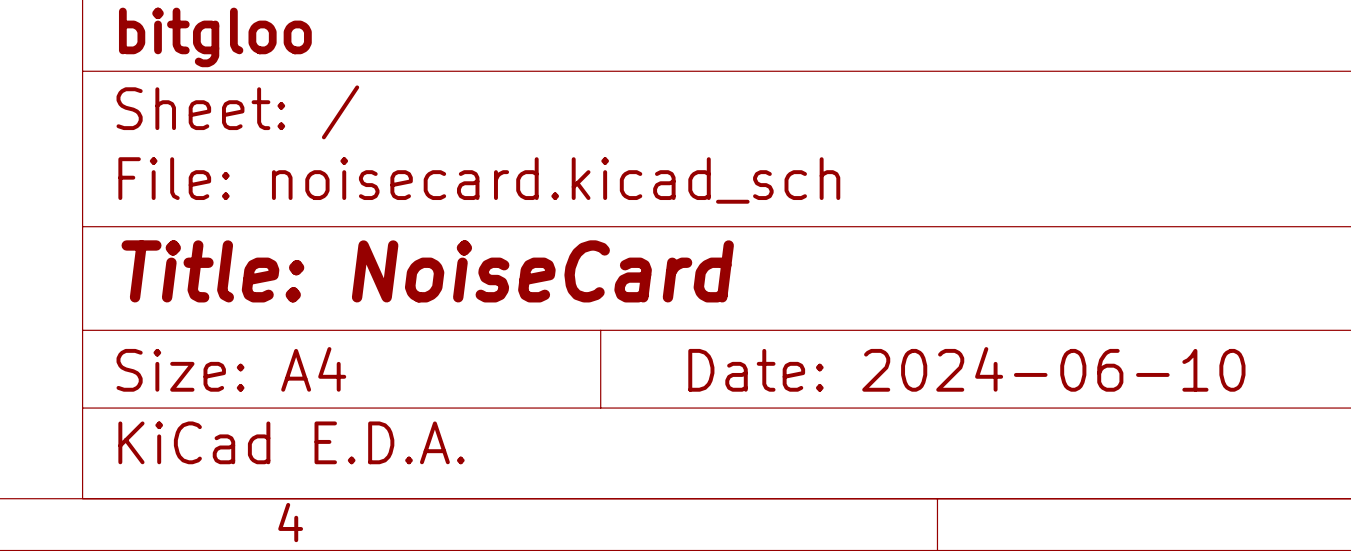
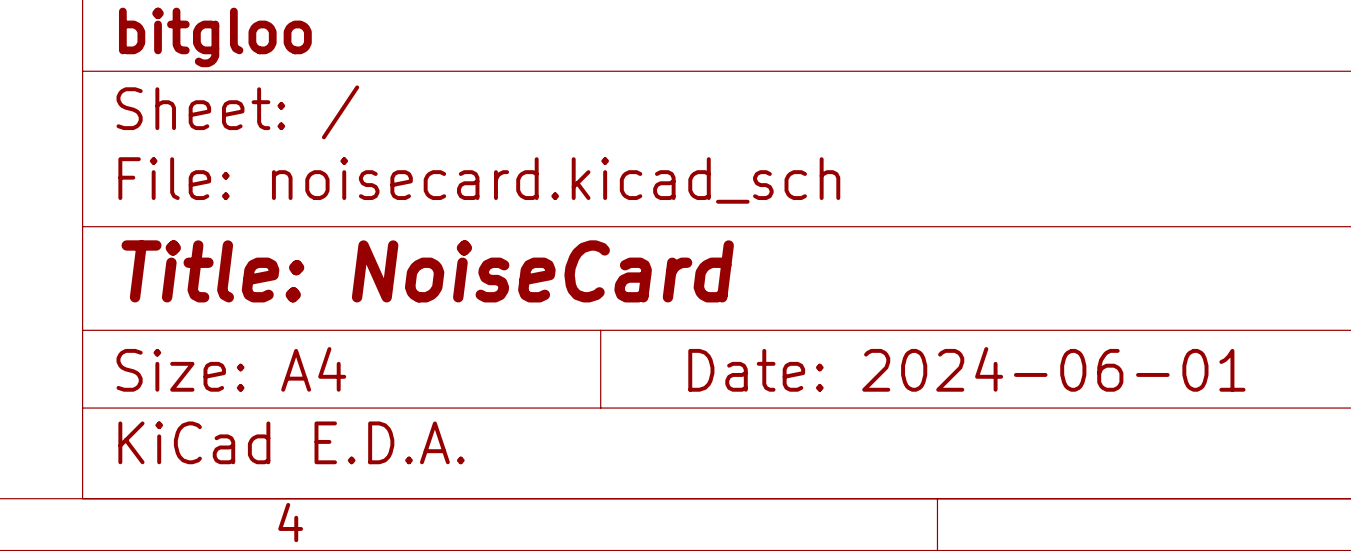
title block: Date: 2024-06-10 (966, 369) -> Date: 2024-06-01 (966, 369)

